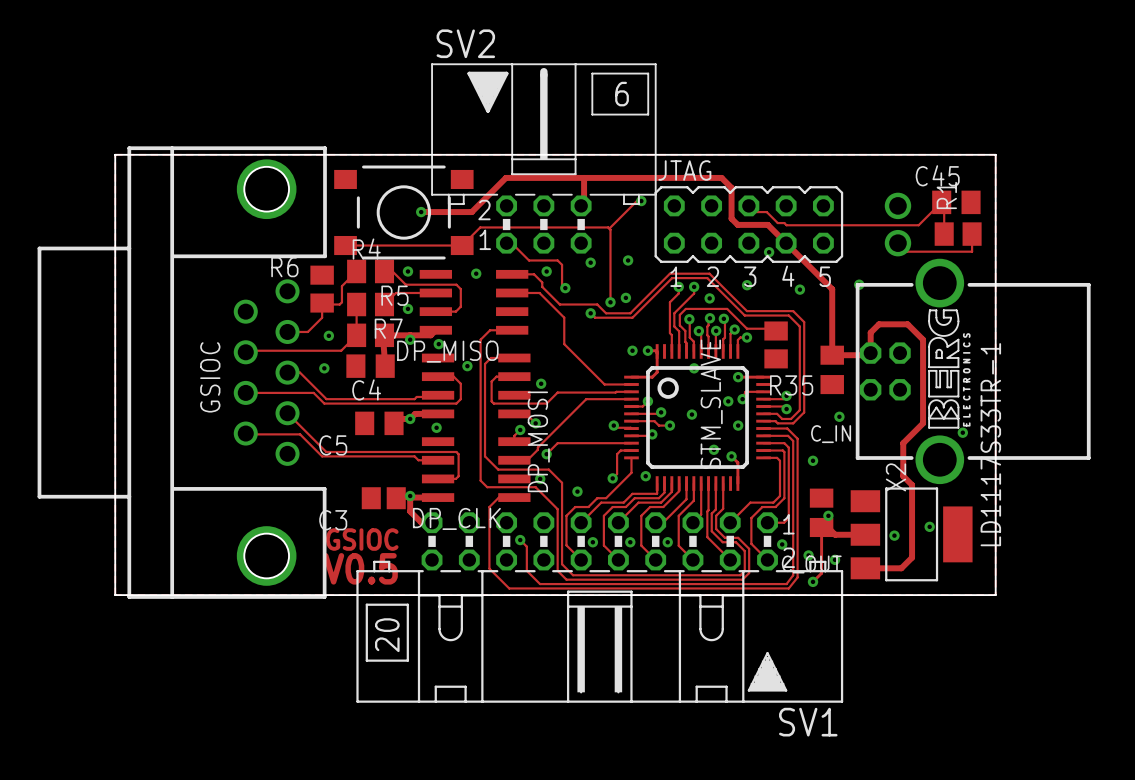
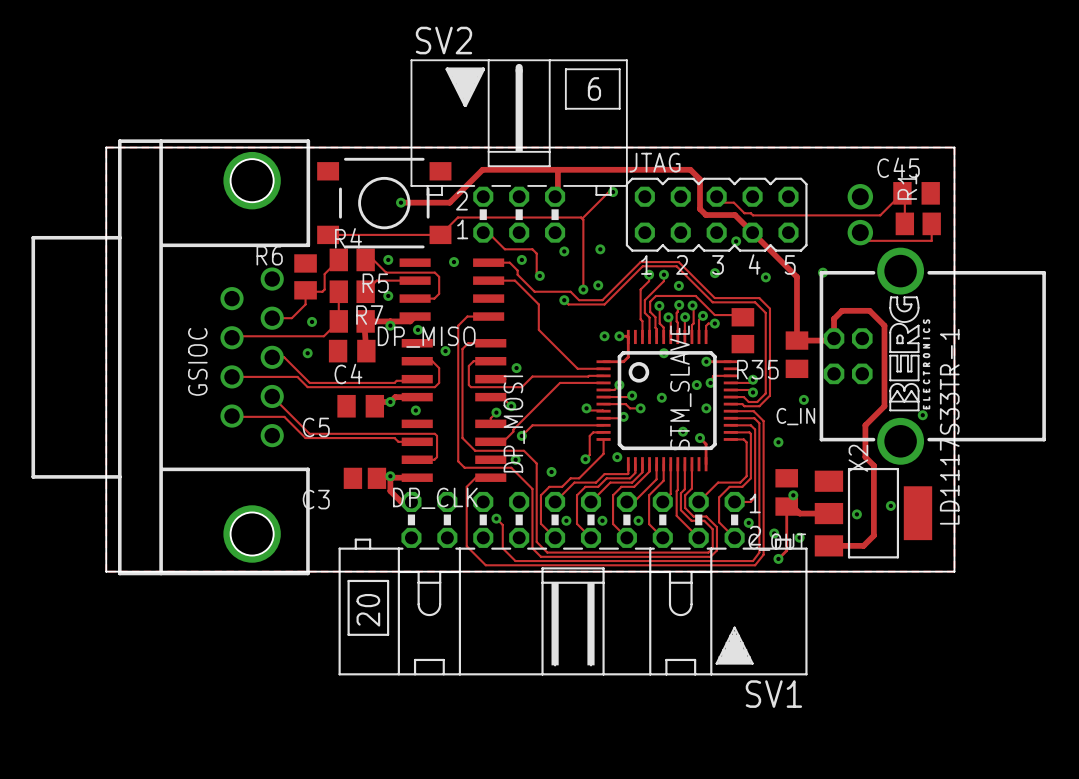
text: GSIOC (362, 539) -> none
text: V0.5 (360, 568) -> none

